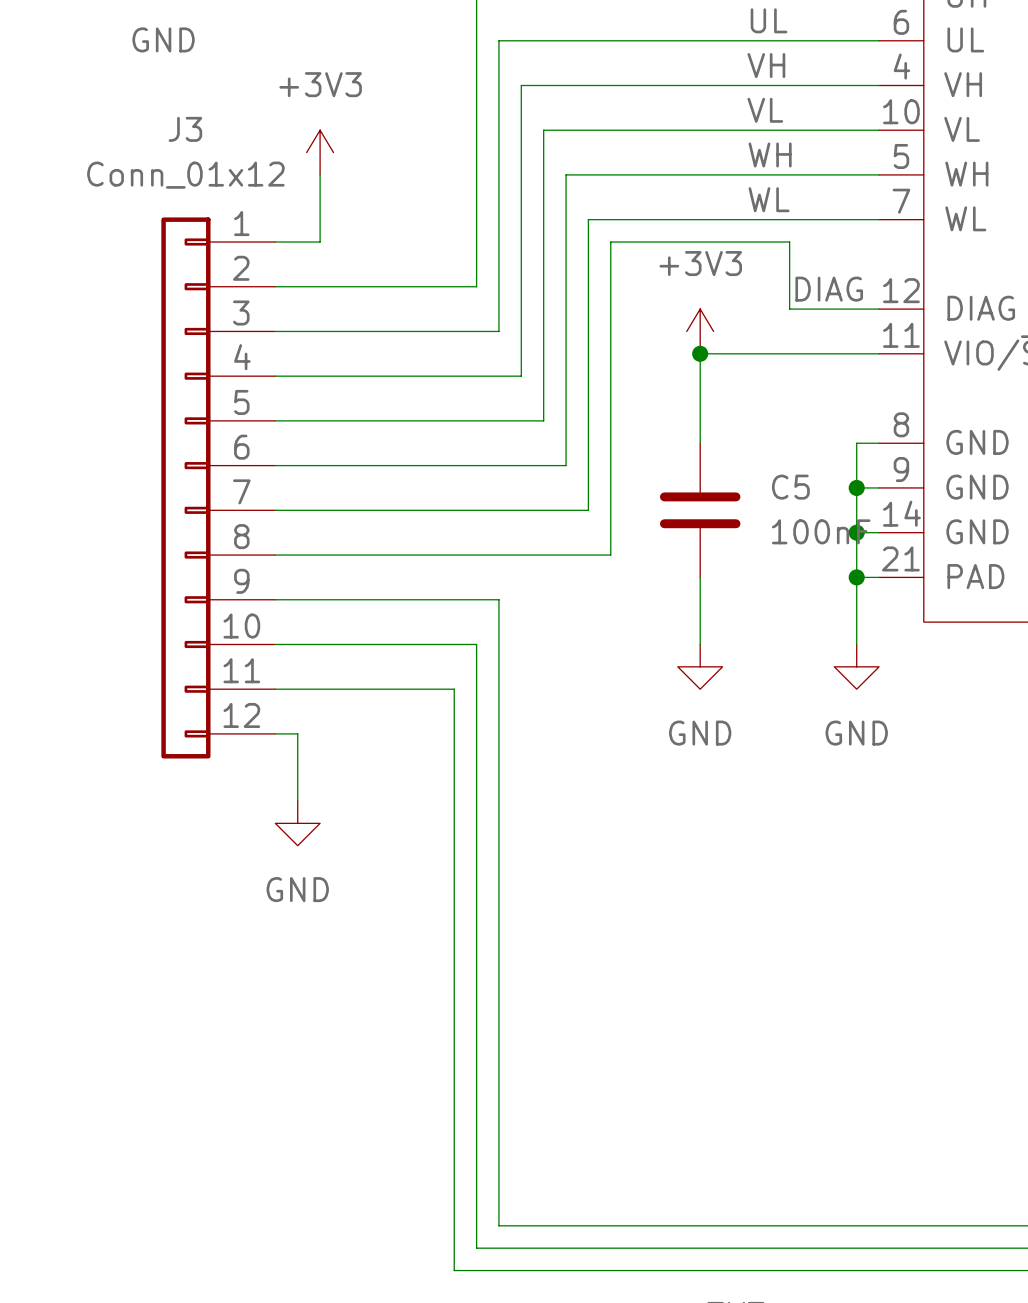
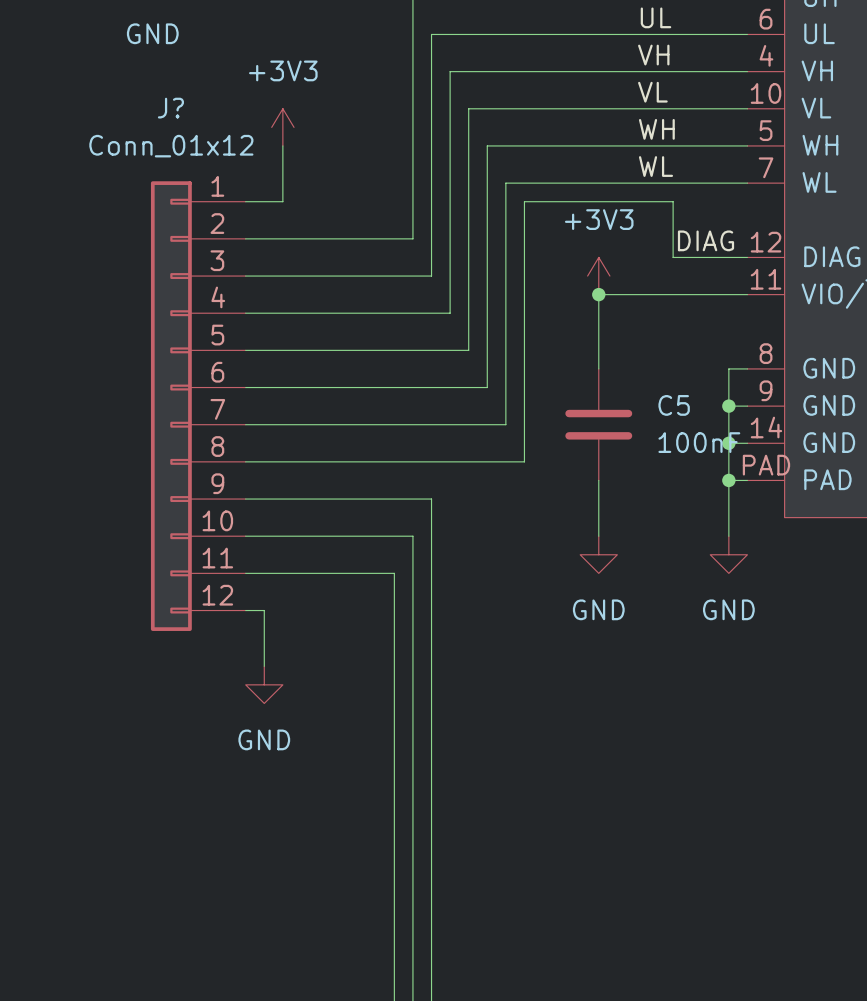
J3 name: J3 (185, 129) -> J? (170, 108)
part pin number: 21 (900, 558) -> PAD (766, 465)

